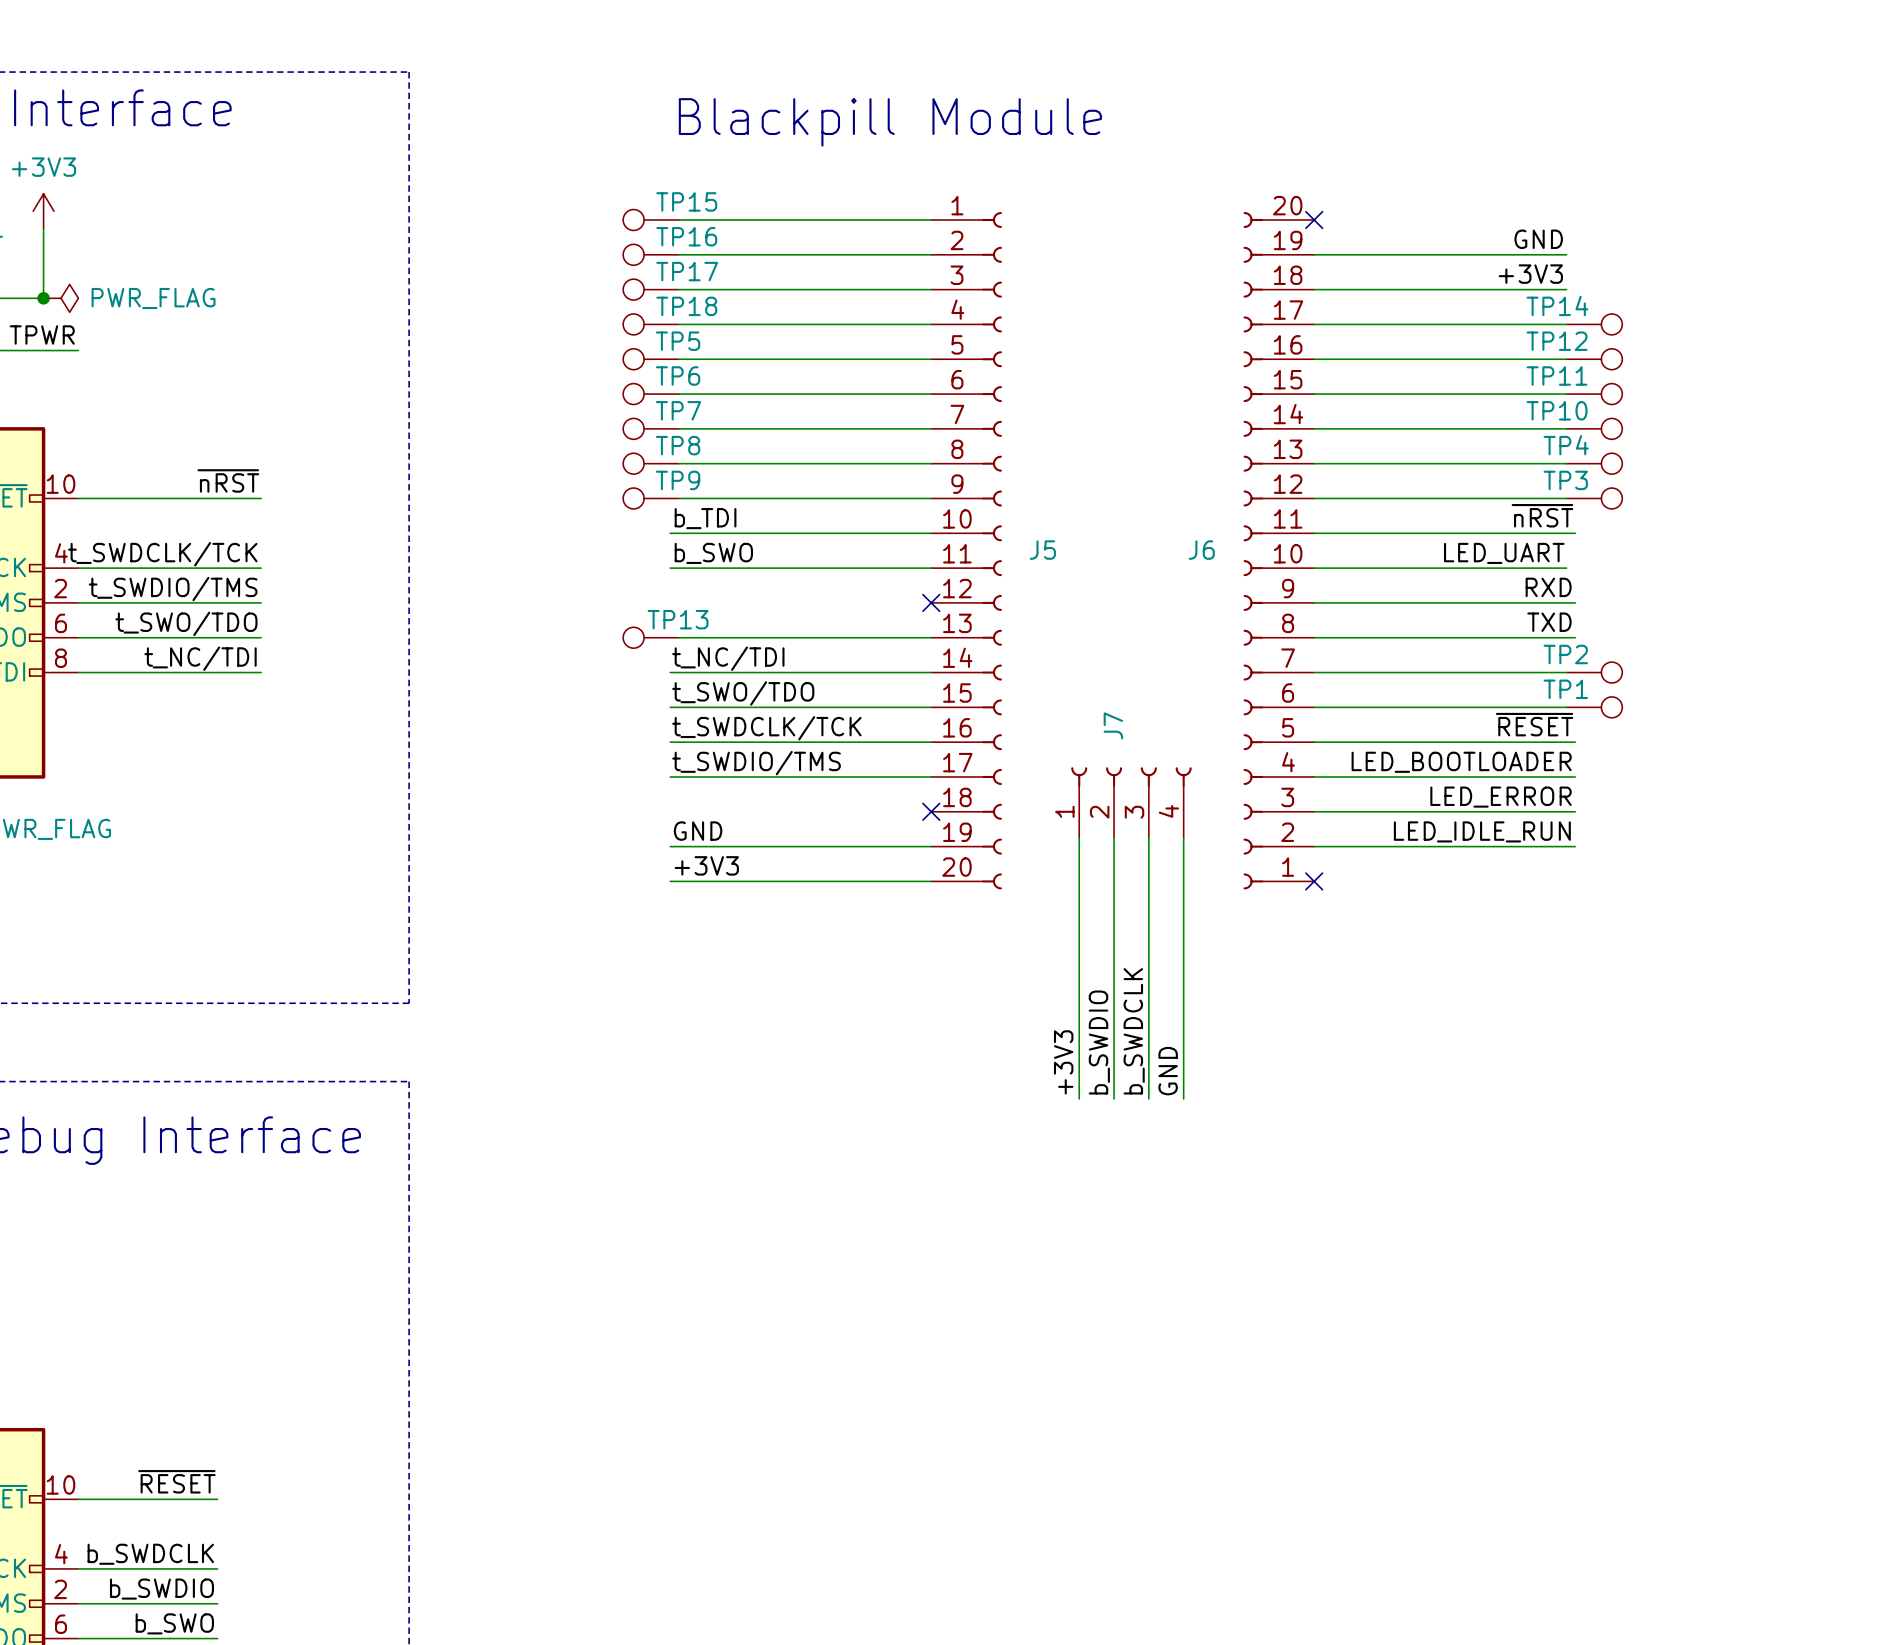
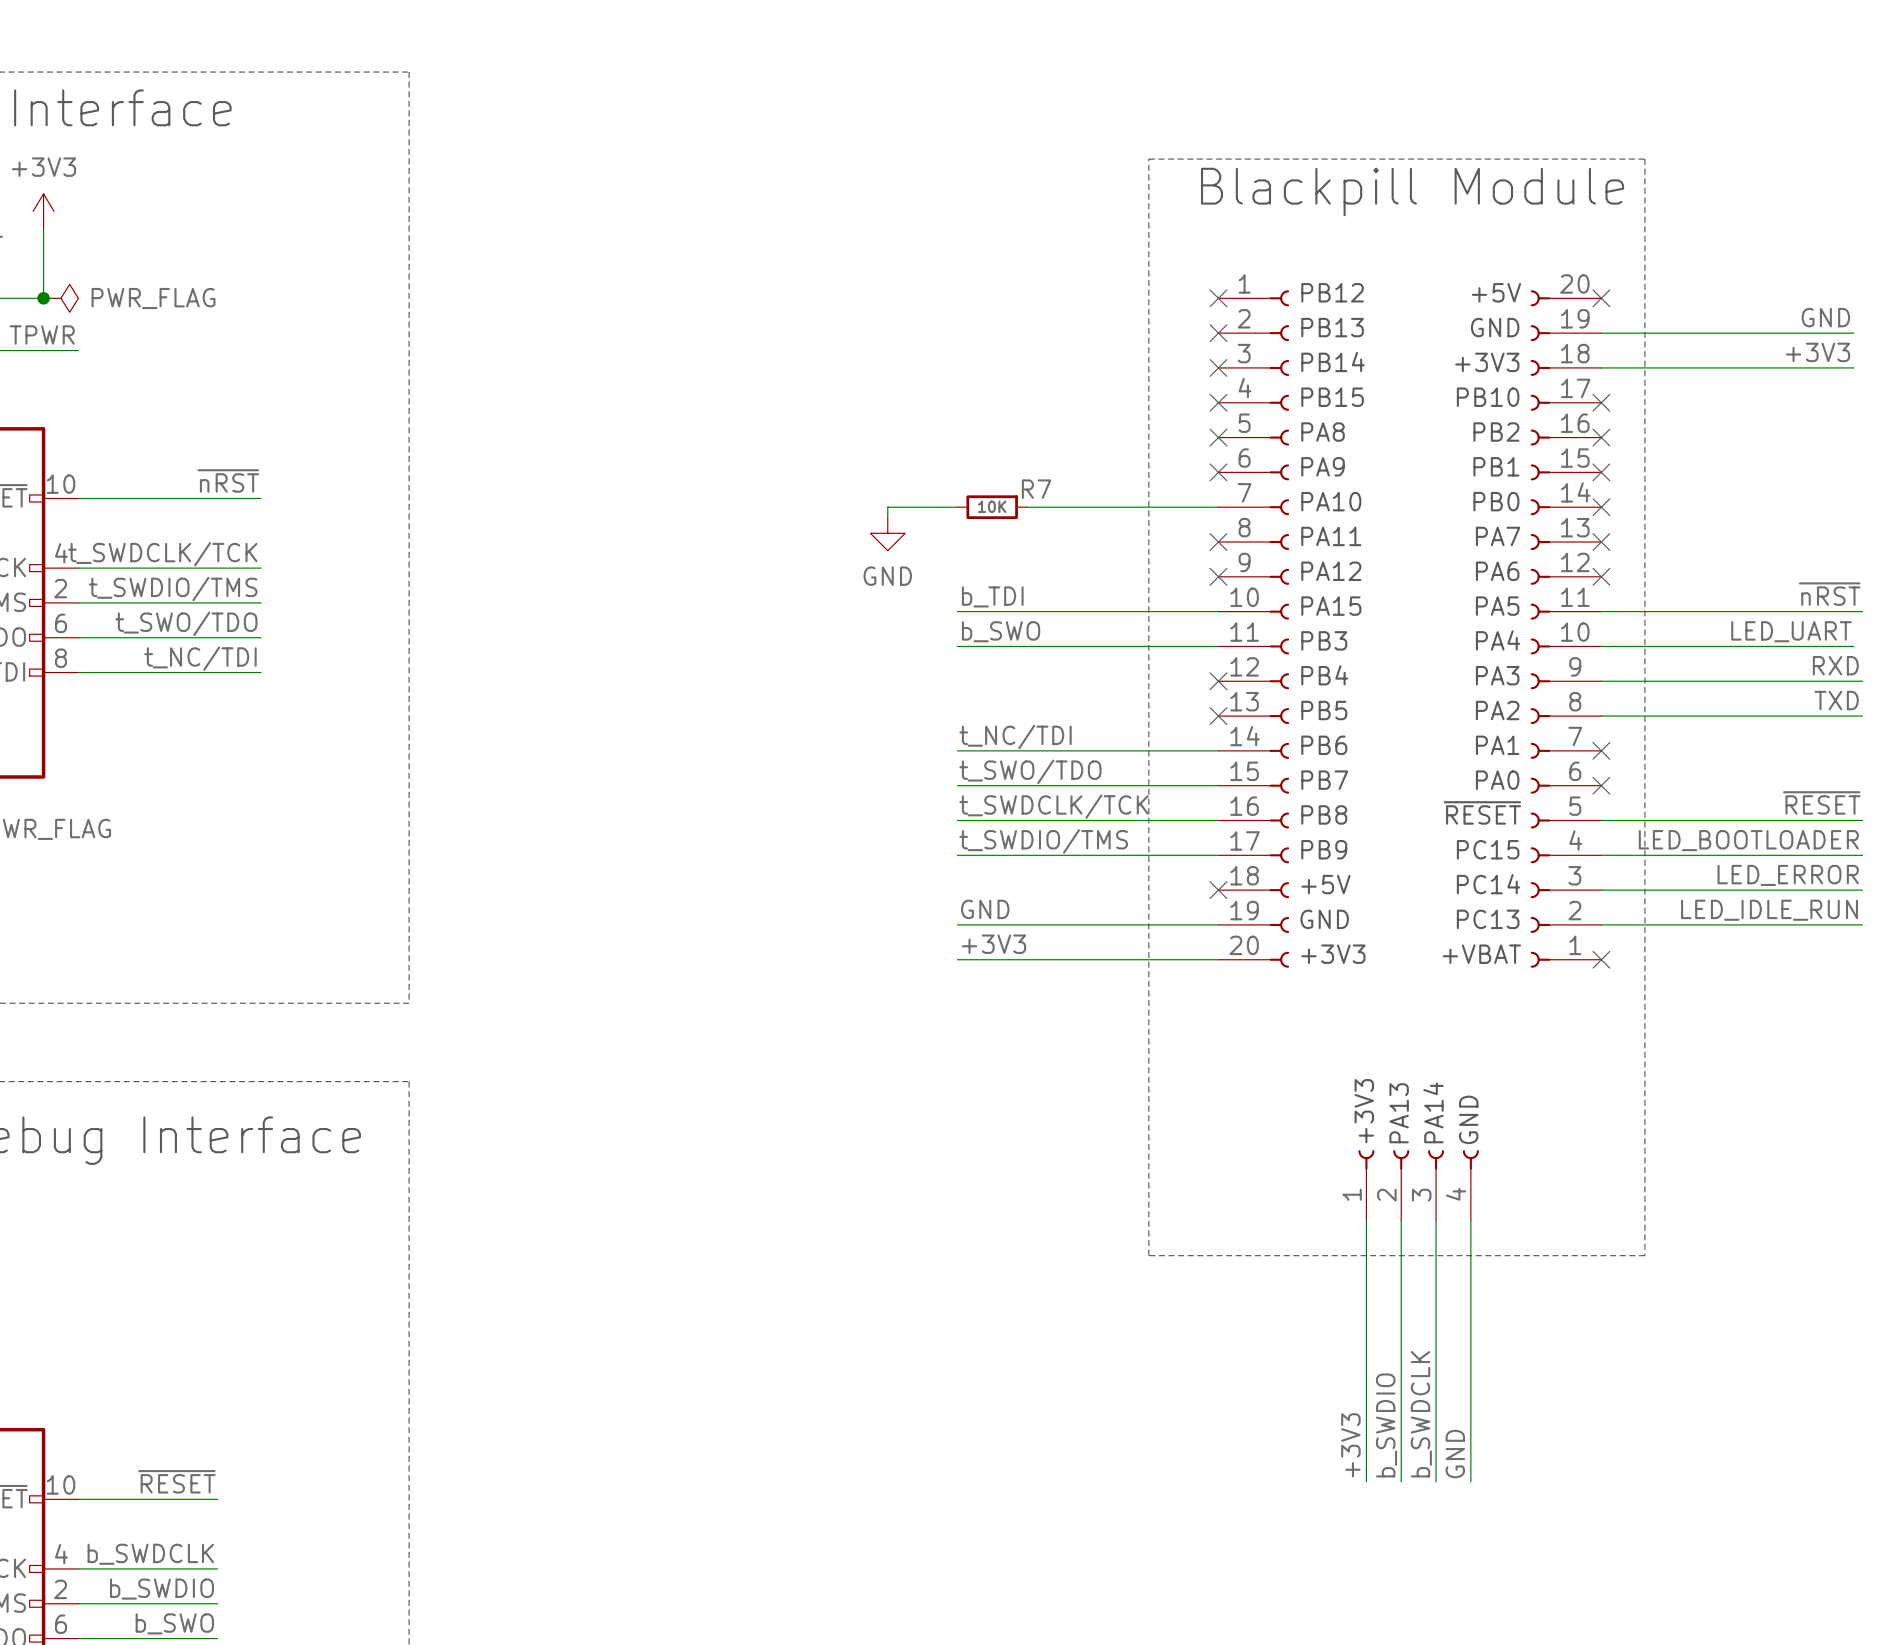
text: Blackpill Module (890, 122) -> none
line: none -> (1148, 159) (1644, 159) (1644, 1255) (1148, 1255) (1148, 159)
text: none -> Blackpill Module (1412, 192)
TP15: (651, 219) -> none
wire: (678, 219) (931, 219) -> none
no-connect mark: (1314, 219) -> none
label position: GND (1538, 239) -> GND (1825, 317)
TP16: (651, 254) -> none
wire: (678, 254) (931, 254) -> none
wire: (1314, 254) (1566, 254) -> (1601, 333) (1853, 333)
label position: +3V3 (1530, 274) -> +3V3 (1818, 352)
TP17: (651, 289) -> none
wire: (678, 289) (931, 289) -> none
wire: (1314, 289) (1566, 289) -> (1601, 367) (1853, 367)
text: none -> PB12 (1332, 292)
text: none -> +5V (1496, 292)
no-connect mark: none -> (1218, 298)
no-connect mark: none -> (1601, 298)
TP18: (651, 324) -> none
wire: (678, 324) (931, 324) -> none
wire: (1314, 324) (1566, 324) -> none
TP14: (1594, 324) -> none
text: none -> PB13 (1332, 327)
text: none -> GND (1495, 327)
no-connect mark: none -> (1218, 333)
TP5: (651, 359) -> none
wire: (678, 359) (931, 359) -> none
wire: (1314, 359) (1566, 359) -> none
TP12: (1594, 359) -> none
text: none -> PB14 (1332, 361)
text: none -> +3V3 (1487, 362)
no-connect mark: none -> (1218, 367)
TP6: (651, 394) -> none
wire: (678, 394) (931, 394) -> none
wire: (1314, 394) (1566, 394) -> none
TP11: (1594, 394) -> none
text: none -> PB15 (1332, 397)
text: none -> PB10 (1488, 397)
no-connect mark: none -> (1218, 402)
no-connect mark: none -> (1601, 402)
TP7: (651, 428) -> none
wire: (678, 428) (931, 428) -> none
wire: (1314, 428) (1566, 428) -> none
TP10: (1594, 428) -> none
text: none -> PA8 (1323, 432)
text: none -> PB2 (1496, 432)
no-connect mark: none -> (1218, 437)
no-connect mark: none -> (1601, 437)
TP8: (651, 463) -> none
wire: (678, 463) (931, 463) -> none
wire: (1314, 463) (1566, 463) -> none
TP4: (1594, 463) -> none
text: none -> PA9 (1323, 466)
text: none -> PB1 (1496, 466)
no-connect mark: none -> (1218, 472)
no-connect mark: none -> (1601, 472)
TP9: (651, 498) -> none
wire: (678, 498) (931, 498) -> none
wire: (1314, 498) (1566, 498) -> none
TP3: (1594, 498) -> none
text: none -> PA10 (1331, 501)
text: none -> PB0 (1496, 501)
wire: none -> (957, 507) (887, 507) (887, 515)
R7: none -> 10K (992, 507)
wire: none -> (1027, 507) (1218, 507)
no-connect mark: none -> (1601, 507)
label position: ~{nRST} (1542, 515) -> ~{nRST} (1829, 594)
label position: b_TDI (705, 518) -> b_TDI (992, 596)
wire: (670, 533) (931, 533) -> (957, 611) (1218, 611)
power symbol: none -> GND (887, 533)
wire: (1314, 533) (1575, 533) -> (1601, 611) (1862, 611)
text: none -> PA11 (1331, 536)
text: none -> PA7 (1498, 536)
no-connect mark: none -> (1218, 542)
no-connect mark: none -> (1601, 542)
J5: (966, 550) -> none
J6: (1278, 550) -> none
label position: b_SWO (713, 553) -> b_SWO (1001, 631)
label position: LED_UART (1504, 553) -> LED_UART (1791, 631)
wire: (670, 568) (931, 568) -> (957, 646) (1218, 646)
wire: (1314, 568) (1566, 568) -> (1601, 646) (1853, 646)
text: none -> PA12 (1331, 571)
text: none -> PA6 (1497, 571)
no-connect mark: none -> (1218, 576)
no-connect mark: none -> (1601, 576)
label position: RXD (1548, 587) -> RXD (1835, 665)
no-connect mark: (931, 602) -> none
wire: (1314, 602) (1575, 602) -> (1601, 681) (1862, 681)
text: none -> PA15 (1331, 606)
text: none -> PA5 (1497, 606)
label position: TXD (1549, 622) -> TXD (1836, 700)
part: none -> (1253, 629)
part: none -> (1566, 629)
TP13: (651, 637) -> none
wire: (678, 637) (931, 637) -> none
wire: (1314, 637) (1575, 637) -> (1601, 716) (1862, 716)
text: none -> PB3 (1324, 640)
text: none -> PA4 (1498, 640)
label position: t_NC/TDI (728, 658) -> t_NC/TDI (1015, 737)
wire: (670, 672) (931, 672) -> (957, 750) (1218, 750)
wire: (1314, 672) (1566, 672) -> none
TP2: (1594, 672) -> none
text: none -> PB4 (1324, 675)
text: none -> PA3 (1497, 675)
no-connect mark: none -> (1218, 681)
label position: t_SWO/TDO (743, 693) -> t_SWO/TDO (1030, 771)
wire: (670, 707) (931, 707) -> (957, 785) (1218, 785)
wire: (1314, 707) (1566, 707) -> none
TP1: (1594, 707) -> none
text: none -> PB5 (1324, 710)
text: none -> PA2 (1497, 710)
no-connect mark: none -> (1218, 716)
label position: ~{RESET} (1534, 724) -> ~{RESET} (1821, 802)
label position: t_SWDCLK/TCK (766, 728) -> t_SWDCLK/TCK (1054, 806)
wire: (670, 742) (931, 742) -> (957, 820) (1218, 820)
wire: (1314, 742) (1575, 742) -> (1601, 820) (1862, 820)
text: none -> PB6 (1324, 745)
text: none -> PA1 (1497, 745)
no-connect mark: none -> (1601, 750)
label position: LED_BOOTLOADER (1461, 762) -> LED_BOOTLOADER (1748, 840)
label position: t_SWDIO/TMS (756, 763) -> t_SWDIO/TMS (1043, 841)
wire: (670, 776) (931, 776) -> (957, 855) (1218, 855)
wire: (1314, 776) (1575, 776) -> (1601, 855) (1862, 855)
text: none -> PB7 (1324, 780)
text: none -> PA0 (1497, 780)
no-connect mark: none -> (1601, 785)
label position: LED_ERROR (1500, 797) -> LED_ERROR (1788, 875)
J7: (1131, 802) -> none
no-connect mark: (931, 811) -> none
wire: (1314, 811) (1575, 811) -> (1601, 890) (1862, 890)
text: none -> ~{RESET} (1482, 812)
text: none -> PB8 (1324, 814)
label: GND (698, 831) -> none
label position: LED_IDLE_RUN (1482, 831) -> LED_IDLE_RUN (1769, 910)
wire: (1079, 837) (1079, 1098) -> none
wire: (1114, 837) (1114, 1098) -> none
wire: (1183, 837) (1183, 1098) -> none
wire: (670, 846) (931, 846) -> (957, 924) (1218, 924)
wire: (1314, 846) (1575, 846) -> (1601, 924) (1862, 924)
text: none -> PB9 (1324, 849)
text: none -> PC15 (1488, 849)
label: +3V3 (706, 865) -> none
wire: (670, 881) (931, 881) -> (957, 959) (1218, 959)
no-connect mark: (1314, 881) -> none
text: none -> +5V (1325, 884)
text: none -> PC14 (1488, 884)
no-connect mark: none -> (1218, 890)
label: none -> GND (985, 909)
text: none -> GND (1324, 919)
text: none -> PC13 (1488, 919)
label: none -> +3V3 (993, 944)
text: none -> +3V3 (1333, 954)
text: none -> +VBAT (1481, 954)
no-connect mark: none -> (1601, 959)
label: b_SWDCLK (1134, 1031) -> none
label: b_SWDIO (1099, 1042) -> none
label: +3V3 (1063, 1062) -> none
label: GND (1168, 1071) -> none
text: none -> +3V3 (1364, 1111)
text: none -> PA14 (1433, 1112)
text: none -> PA13 (1399, 1113)
text: none -> GND (1468, 1119)
part: none -> (1418, 1185)
wire: none -> (1366, 1220) (1366, 1481)
wire: none -> (1401, 1220) (1401, 1481)
wire: none -> (1436, 1220) (1436, 1481)
wire: none -> (1470, 1220) (1470, 1481)
label: none -> b_SWDCLK (1421, 1414)
label: none -> b_SWDIO (1386, 1425)
label: none -> +3V3 (1350, 1445)
label: none -> GND (1455, 1454)

